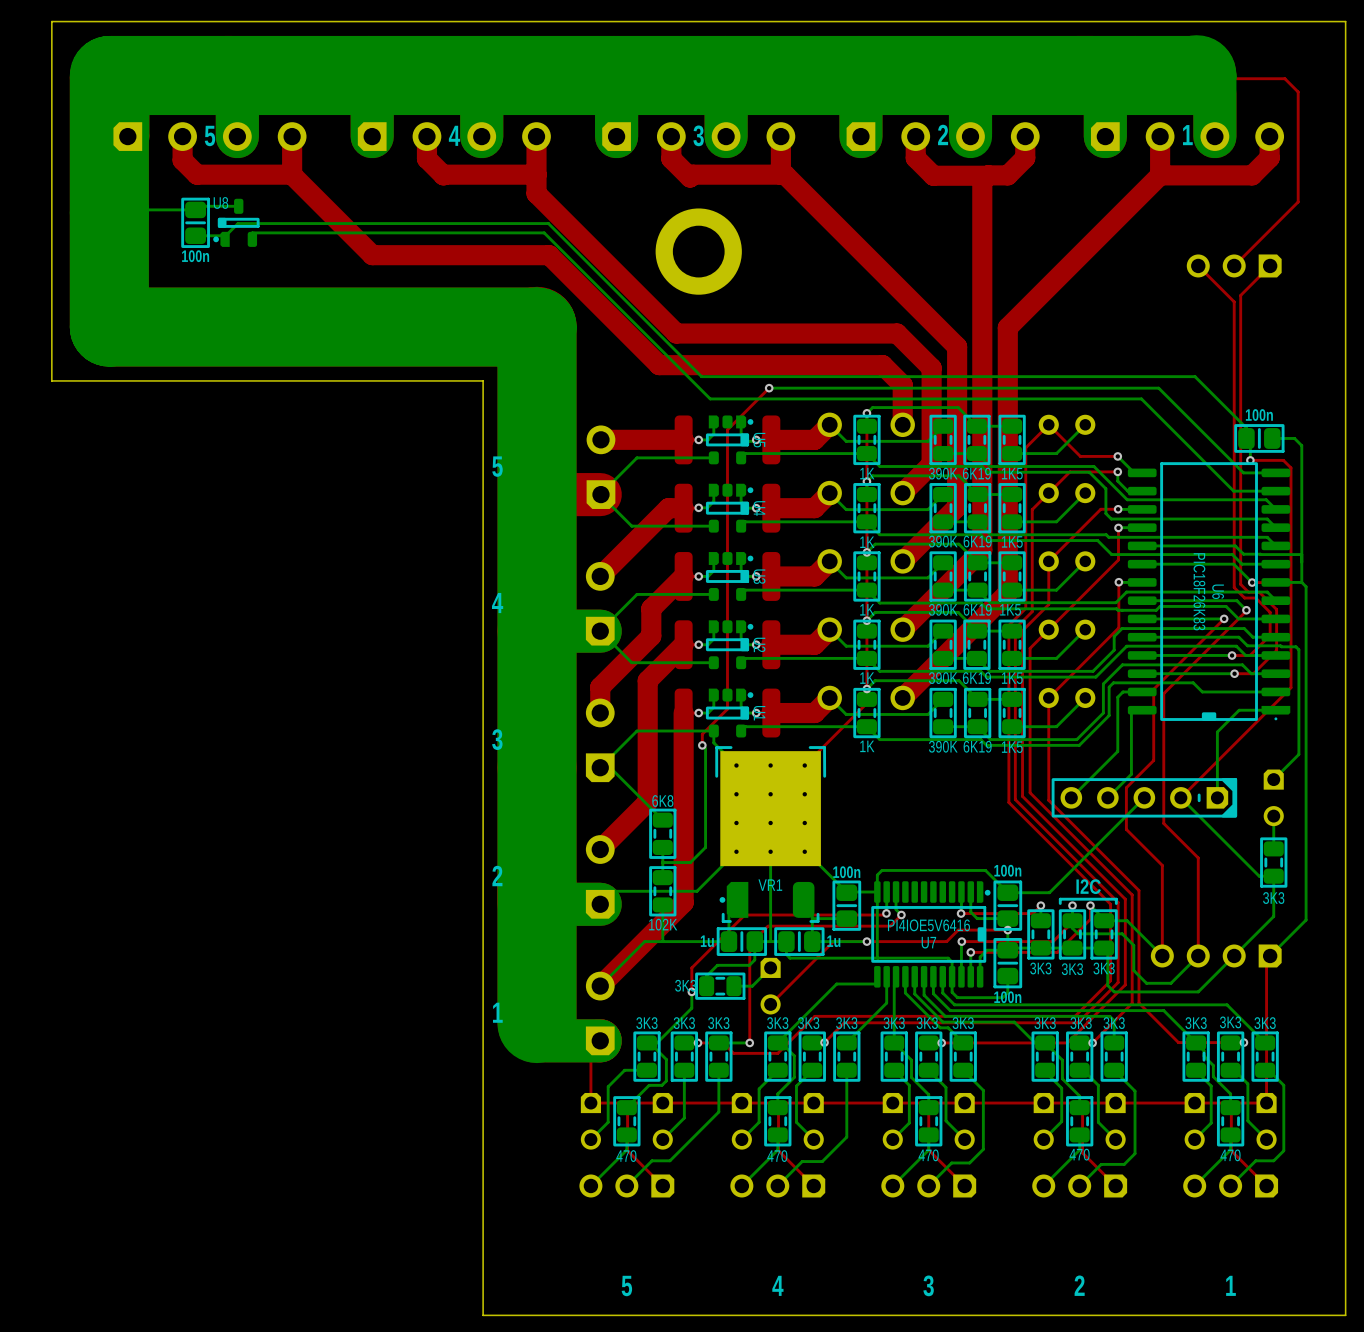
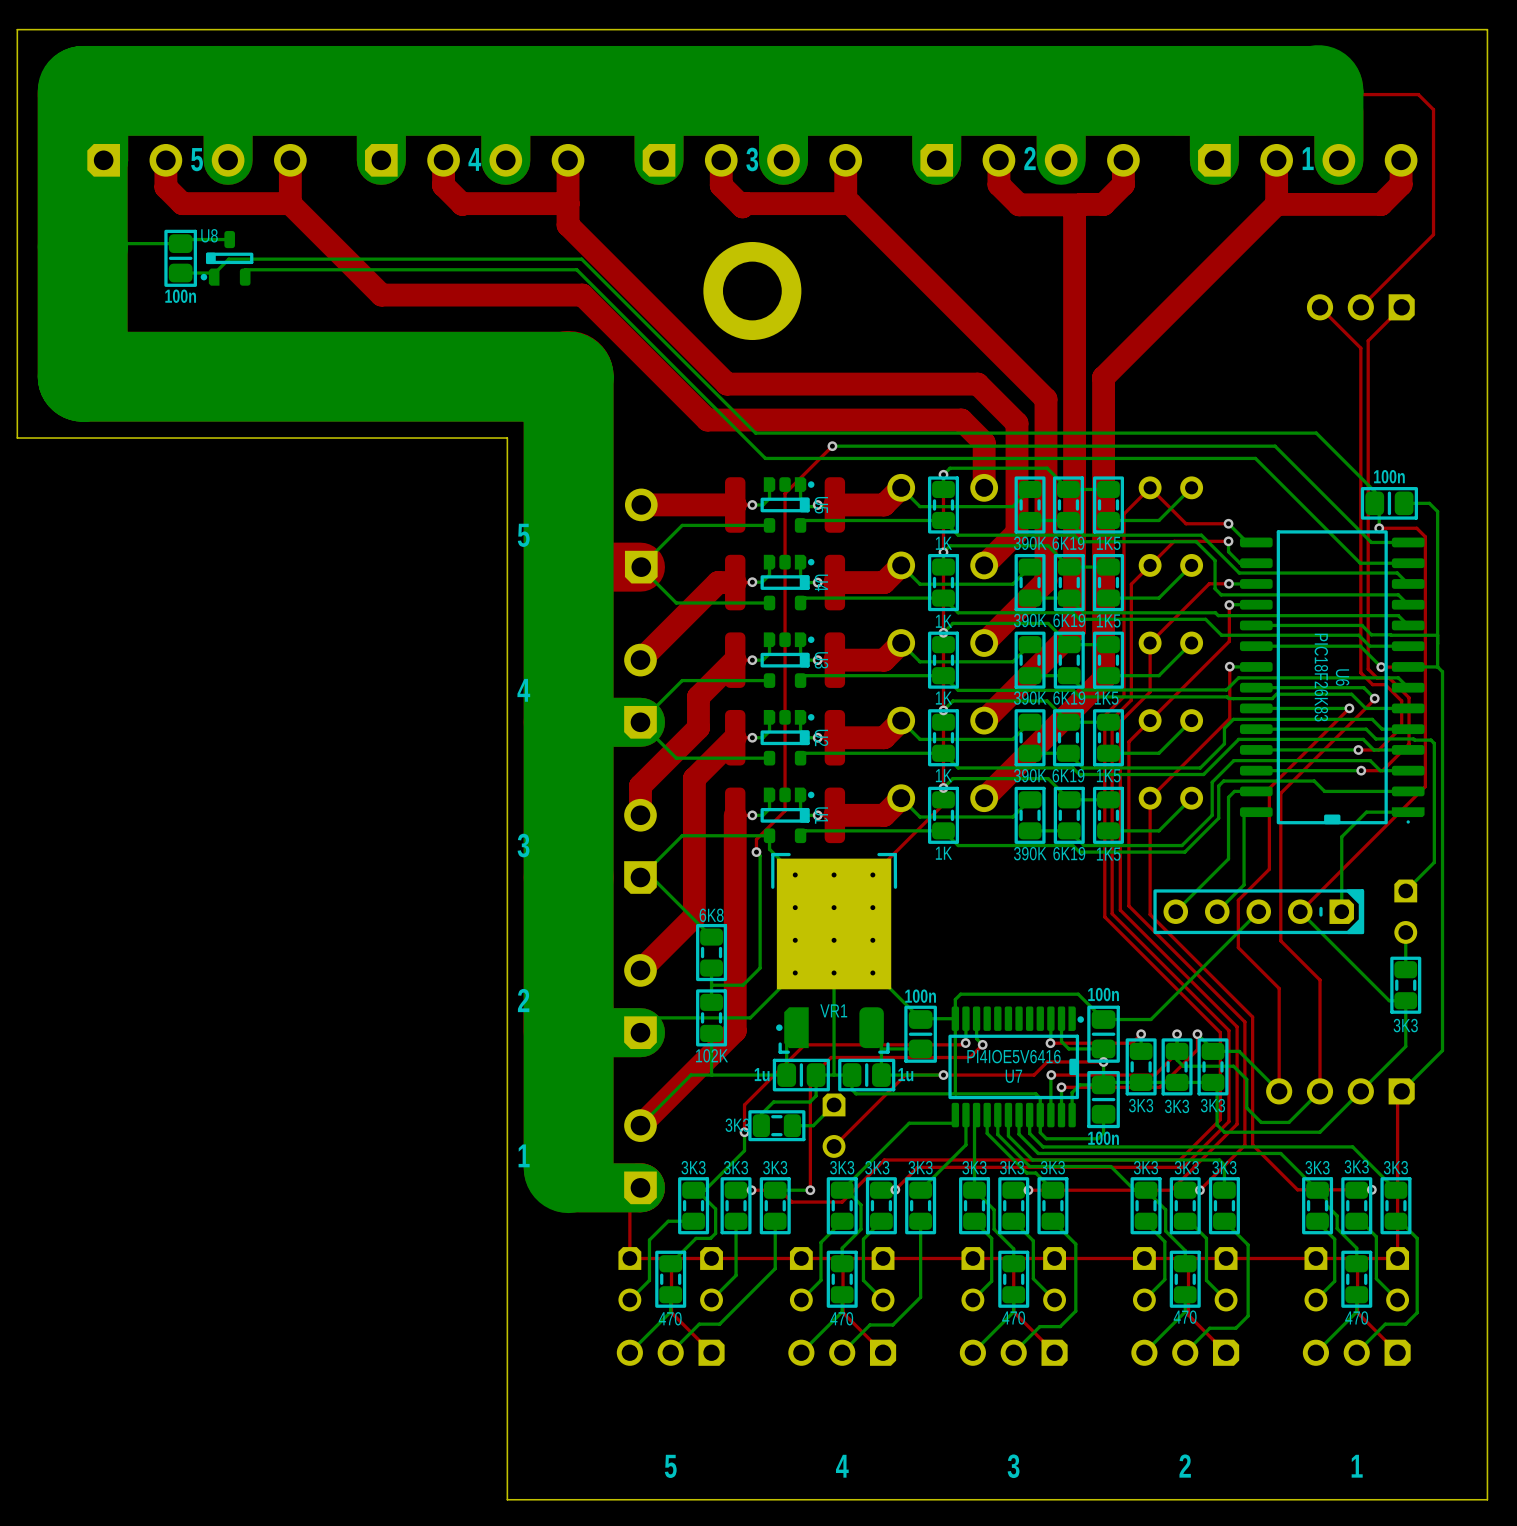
text: I2C (1088, 886) -> none
line: (1116, 903) (1116, 899) (1060, 899) (1060, 903) -> none

